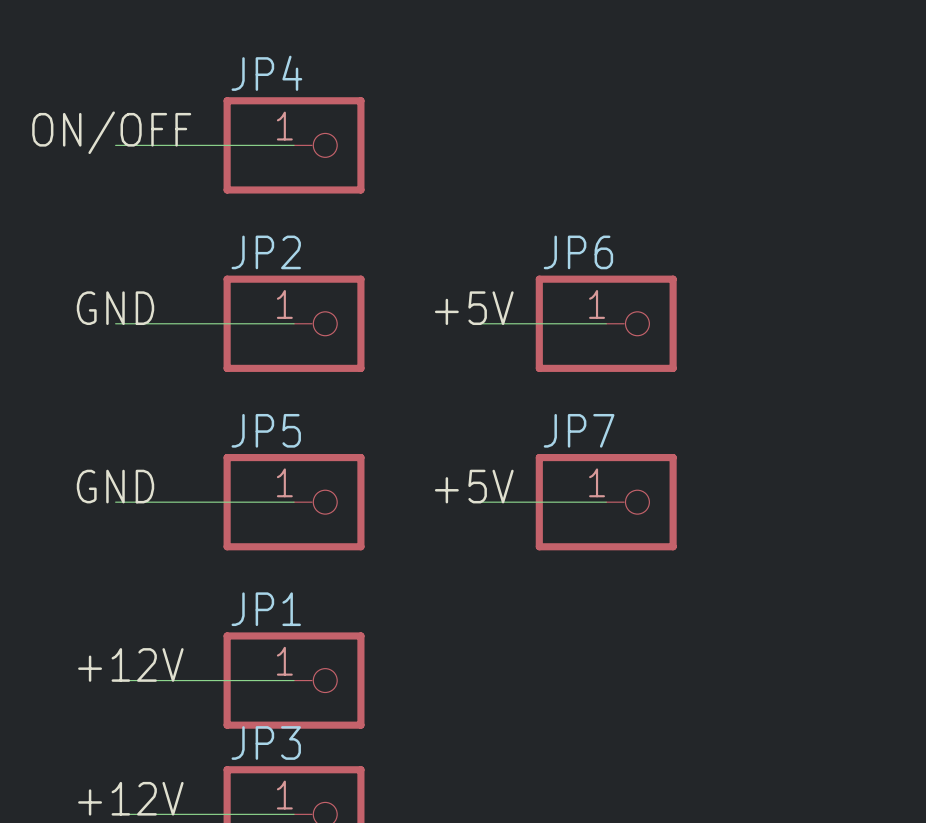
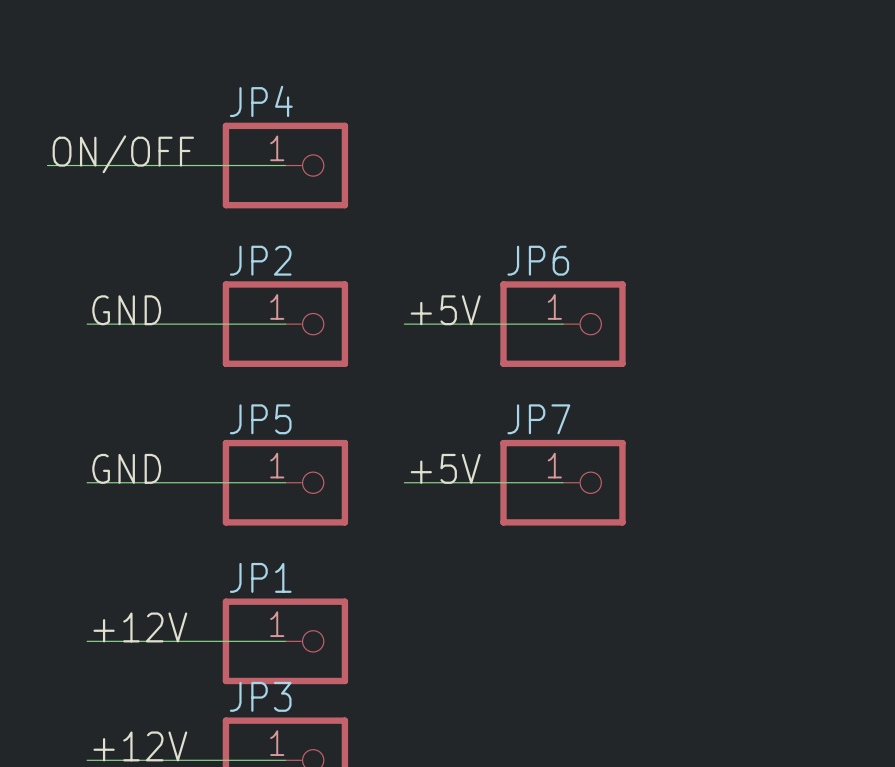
wire: none -> (47, 165) (126, 165)
wire: none -> (87, 324) (126, 324)
wire: none -> (404, 324) (444, 324)
wire: none -> (87, 482) (126, 482)
wire: none -> (404, 482) (444, 482)
wire: none -> (87, 641) (126, 641)
wire: none -> (87, 760) (126, 760)

